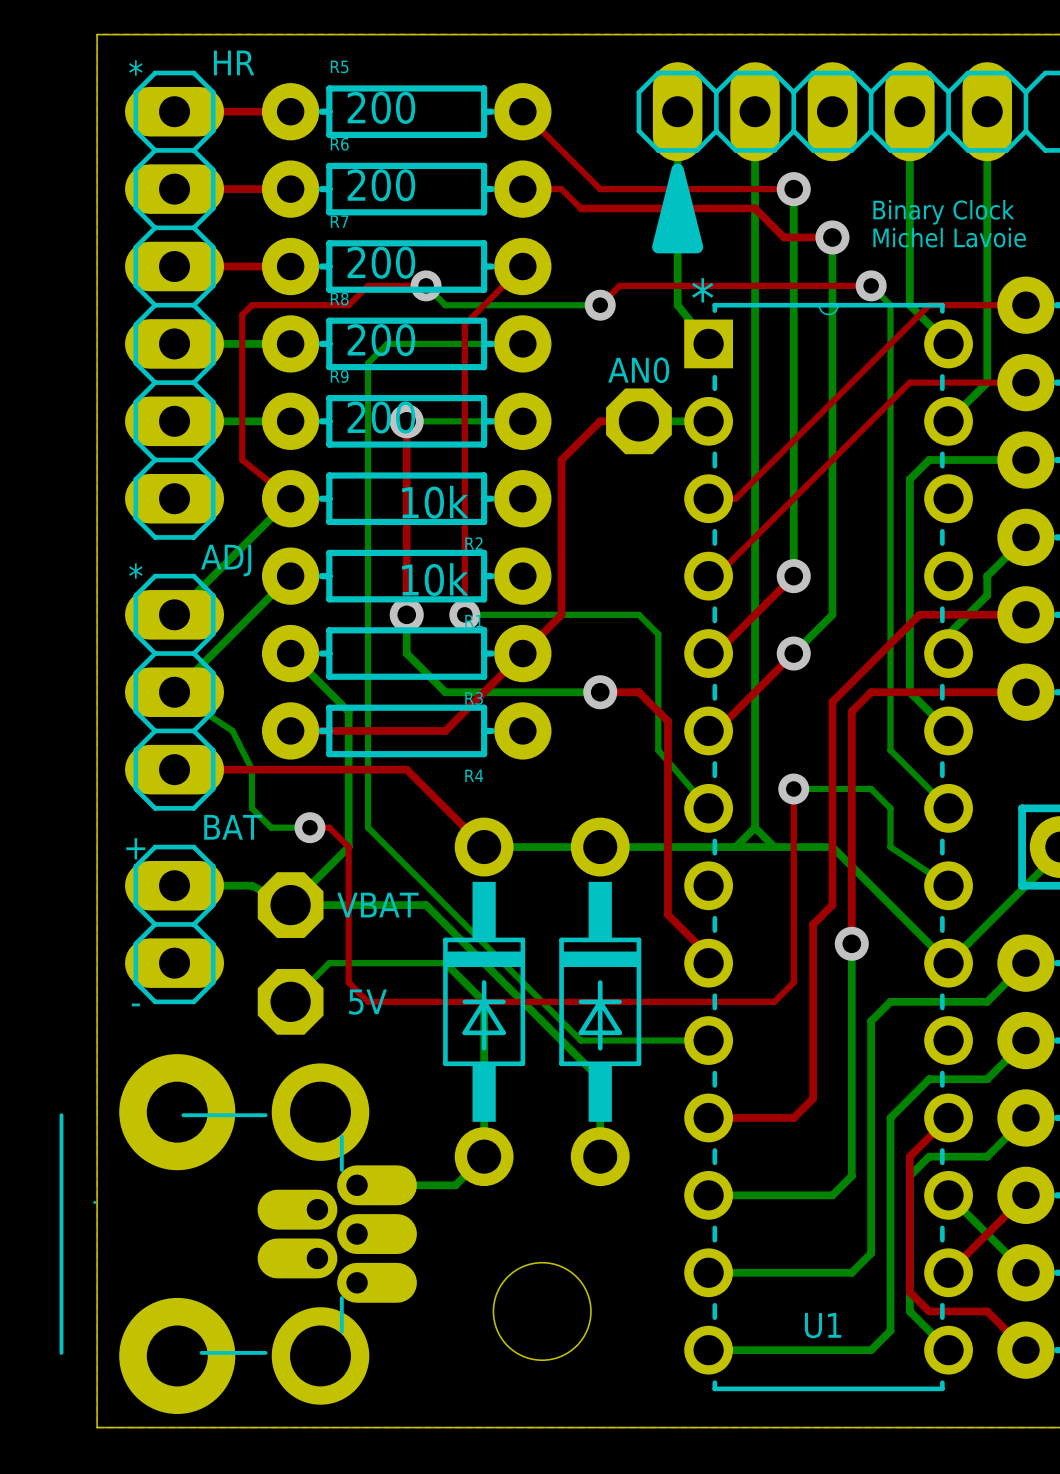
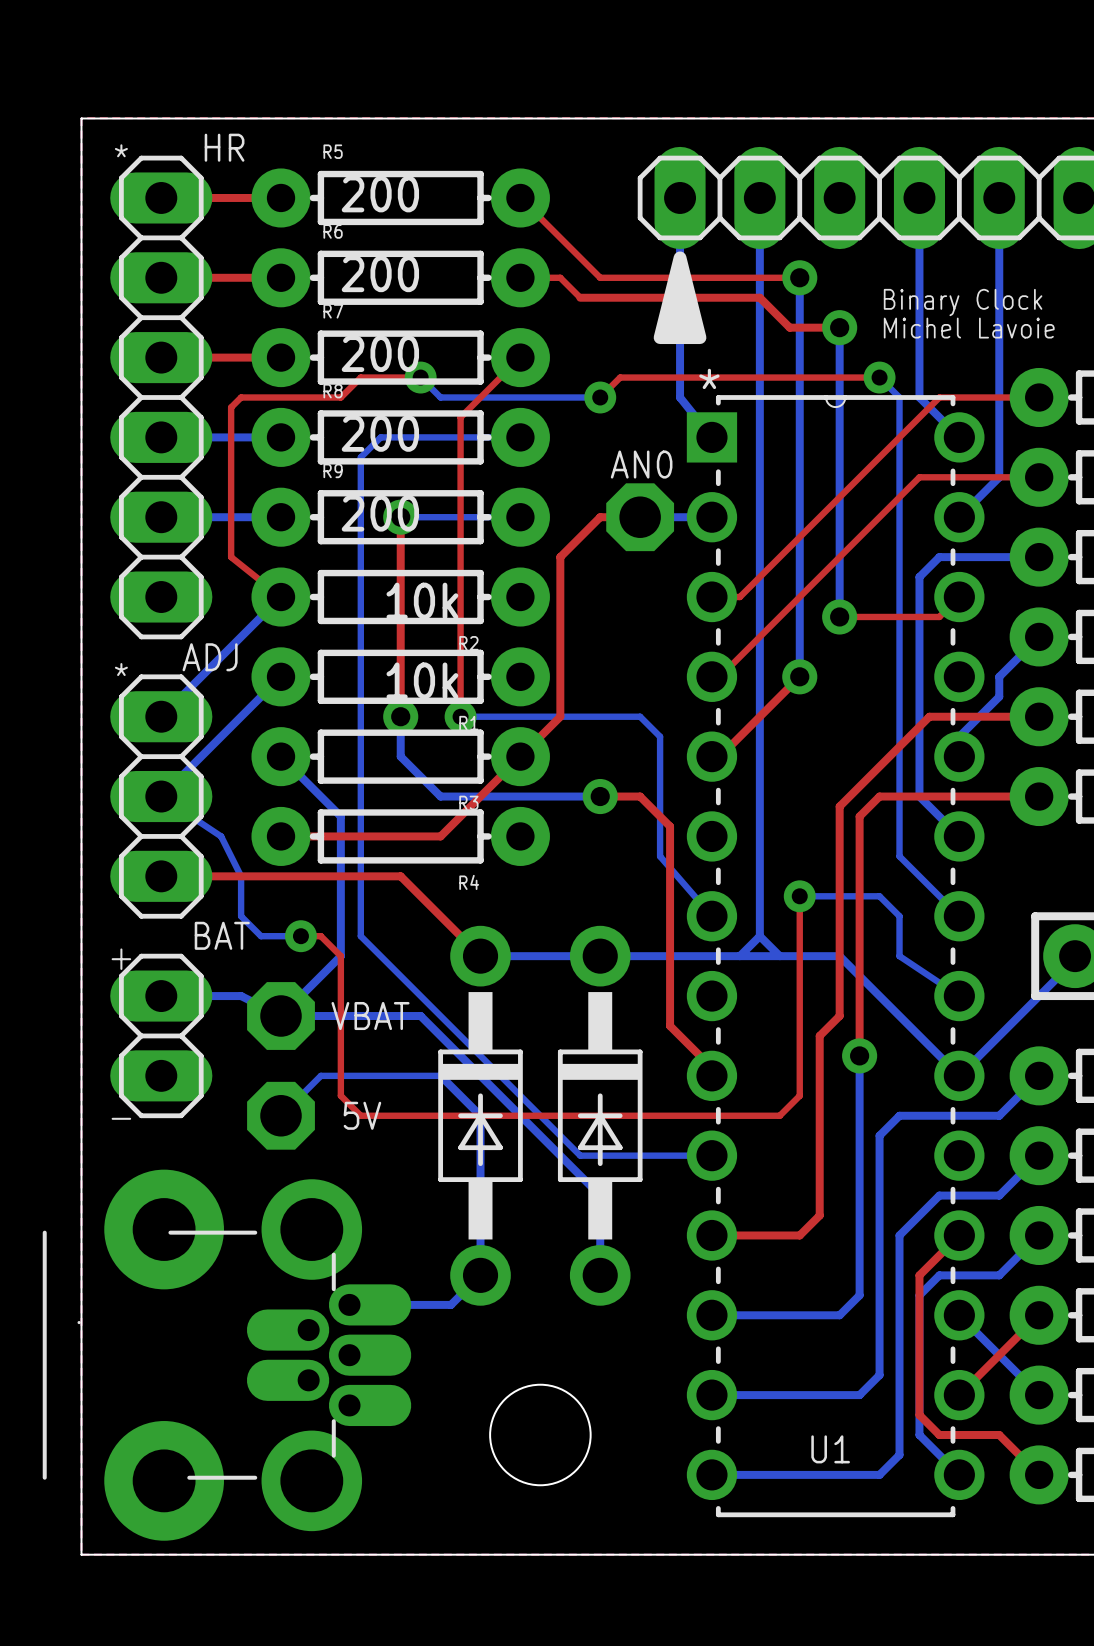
top track: none -> (959, 597) (939, 616) (839, 616)
bottom track: (832, 518) (832, 614) (793, 653) -> none
top track: (793, 653) (716, 730) (708, 730) -> none
via position: (793, 653) -> (839, 616)

